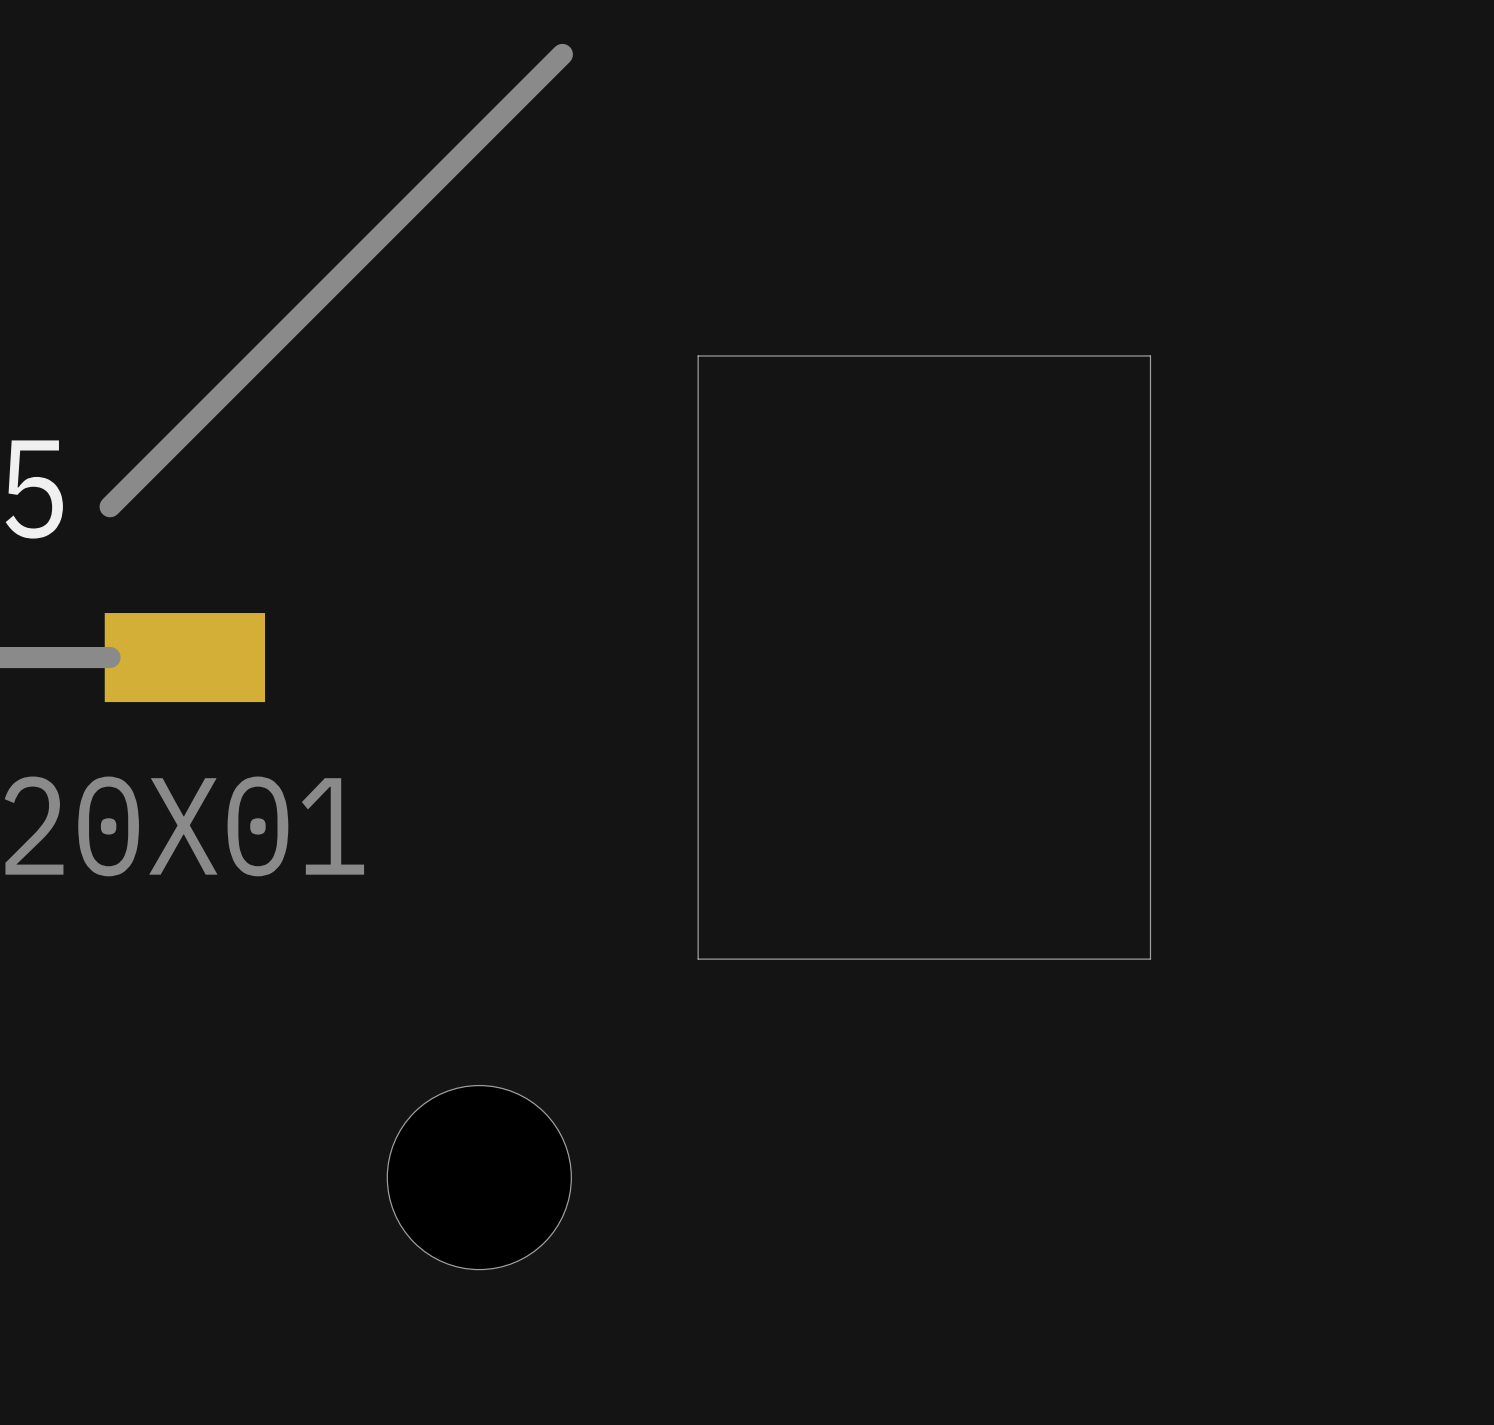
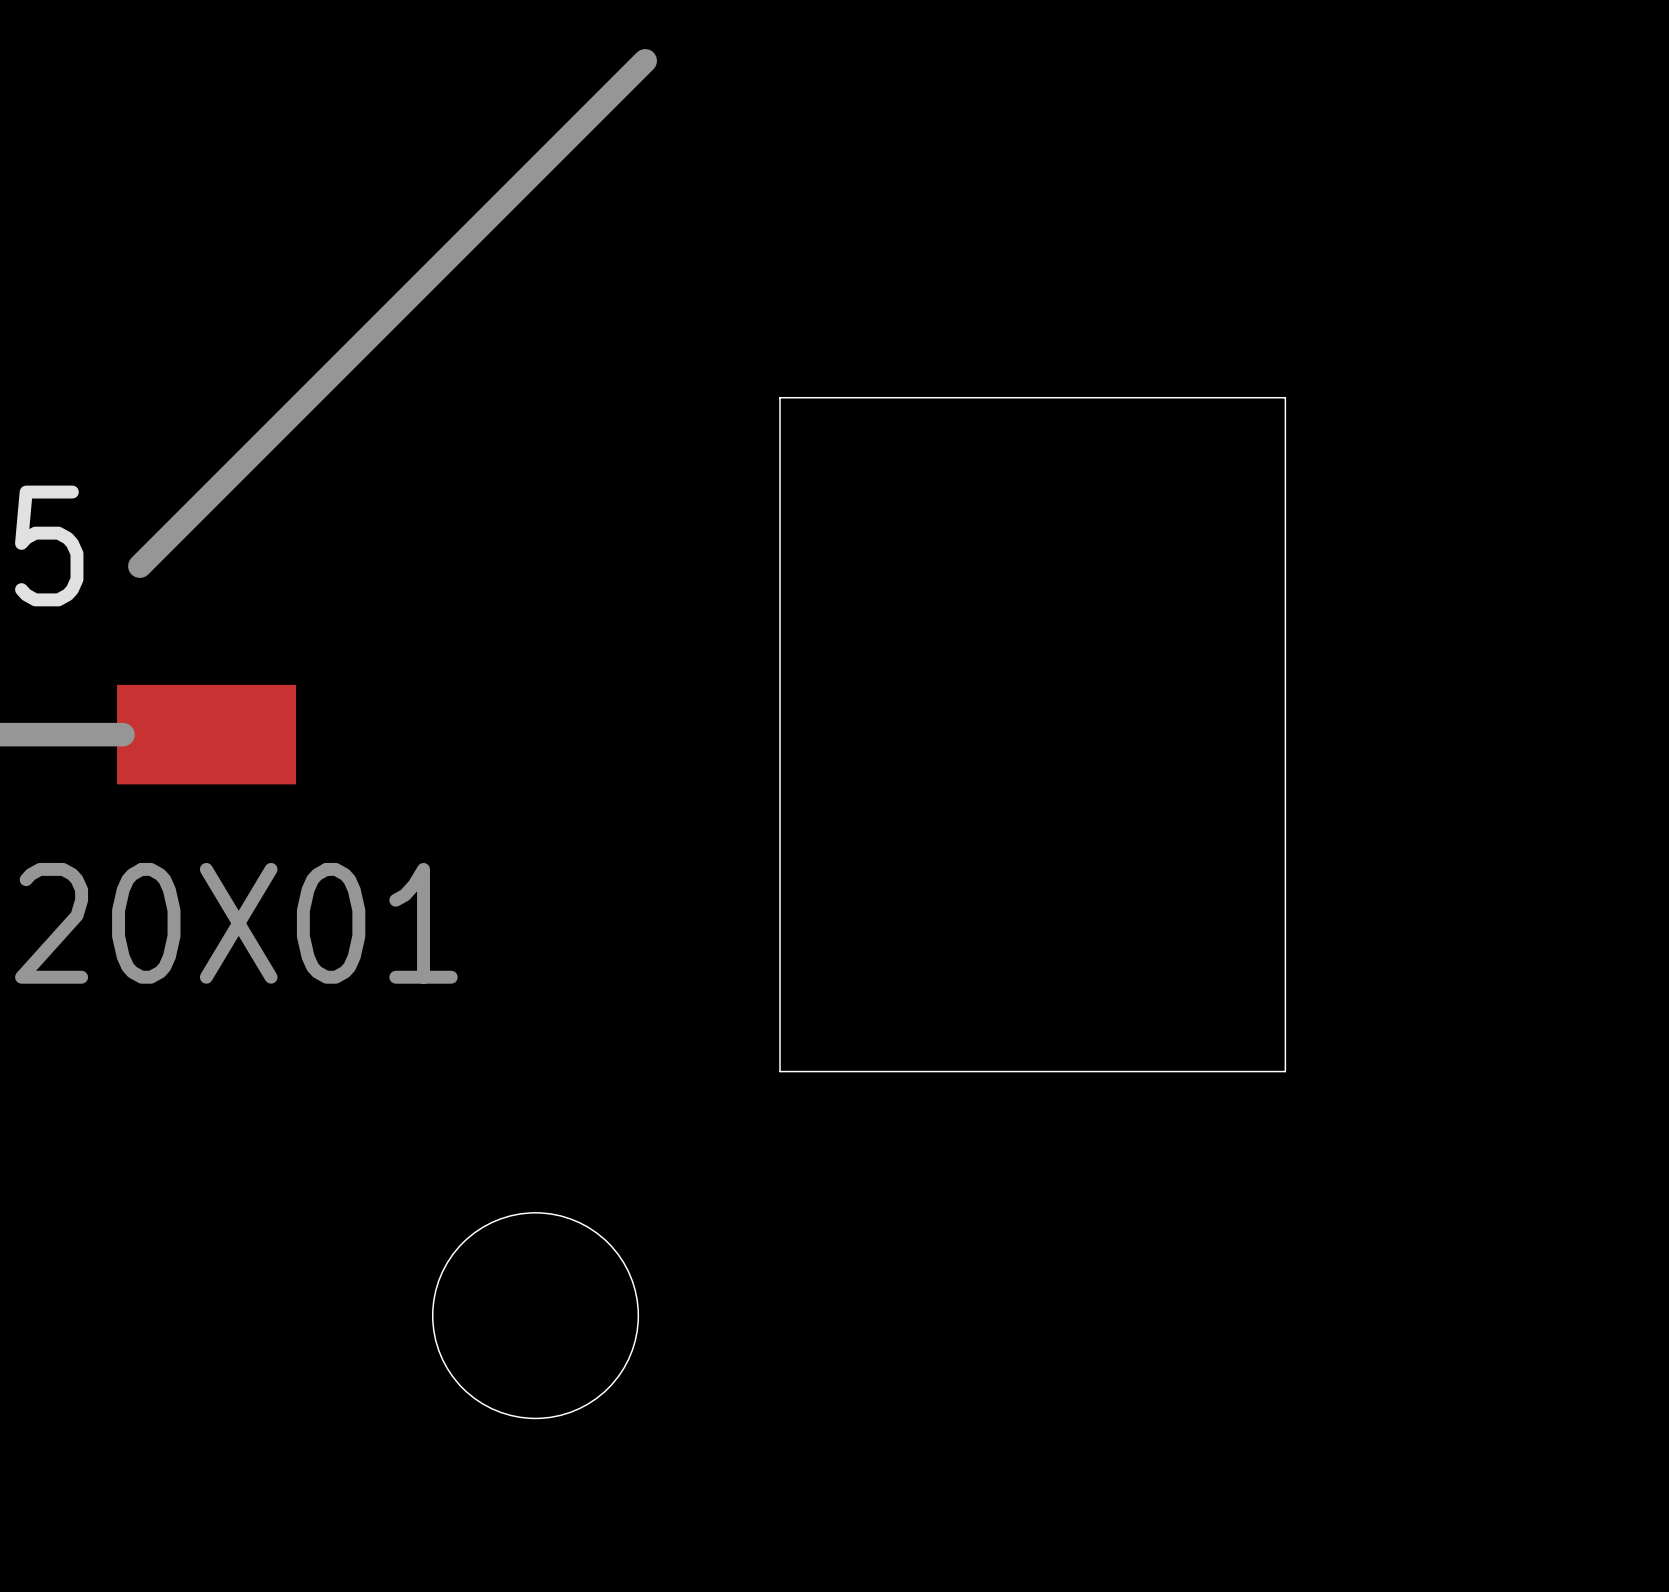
line: (562, 54) (110, 506) -> (645, 60) (139, 566)

